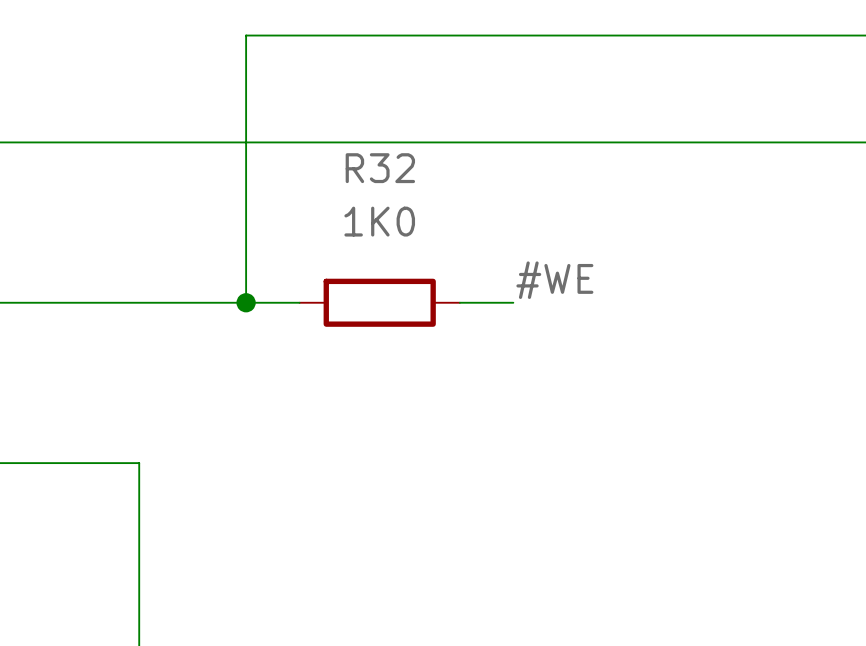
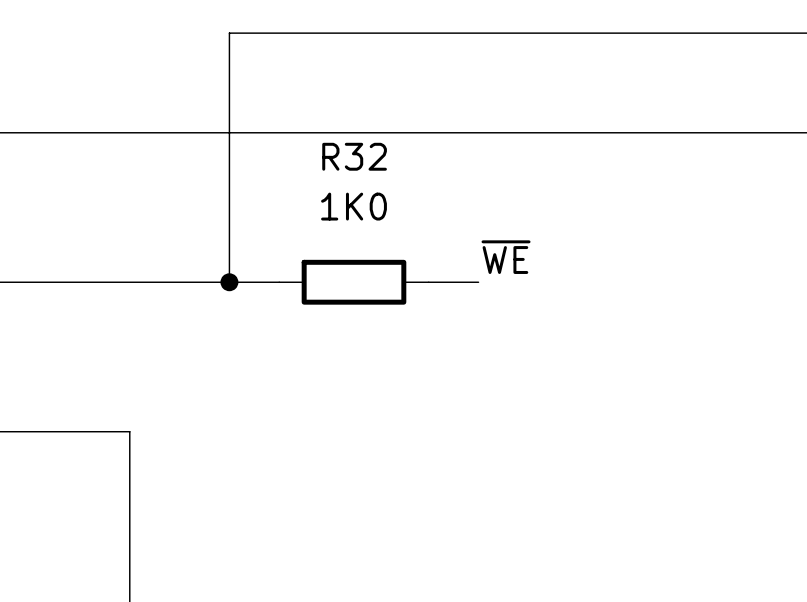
label: #WE (554, 280) -> ~{WE} (506, 257)

